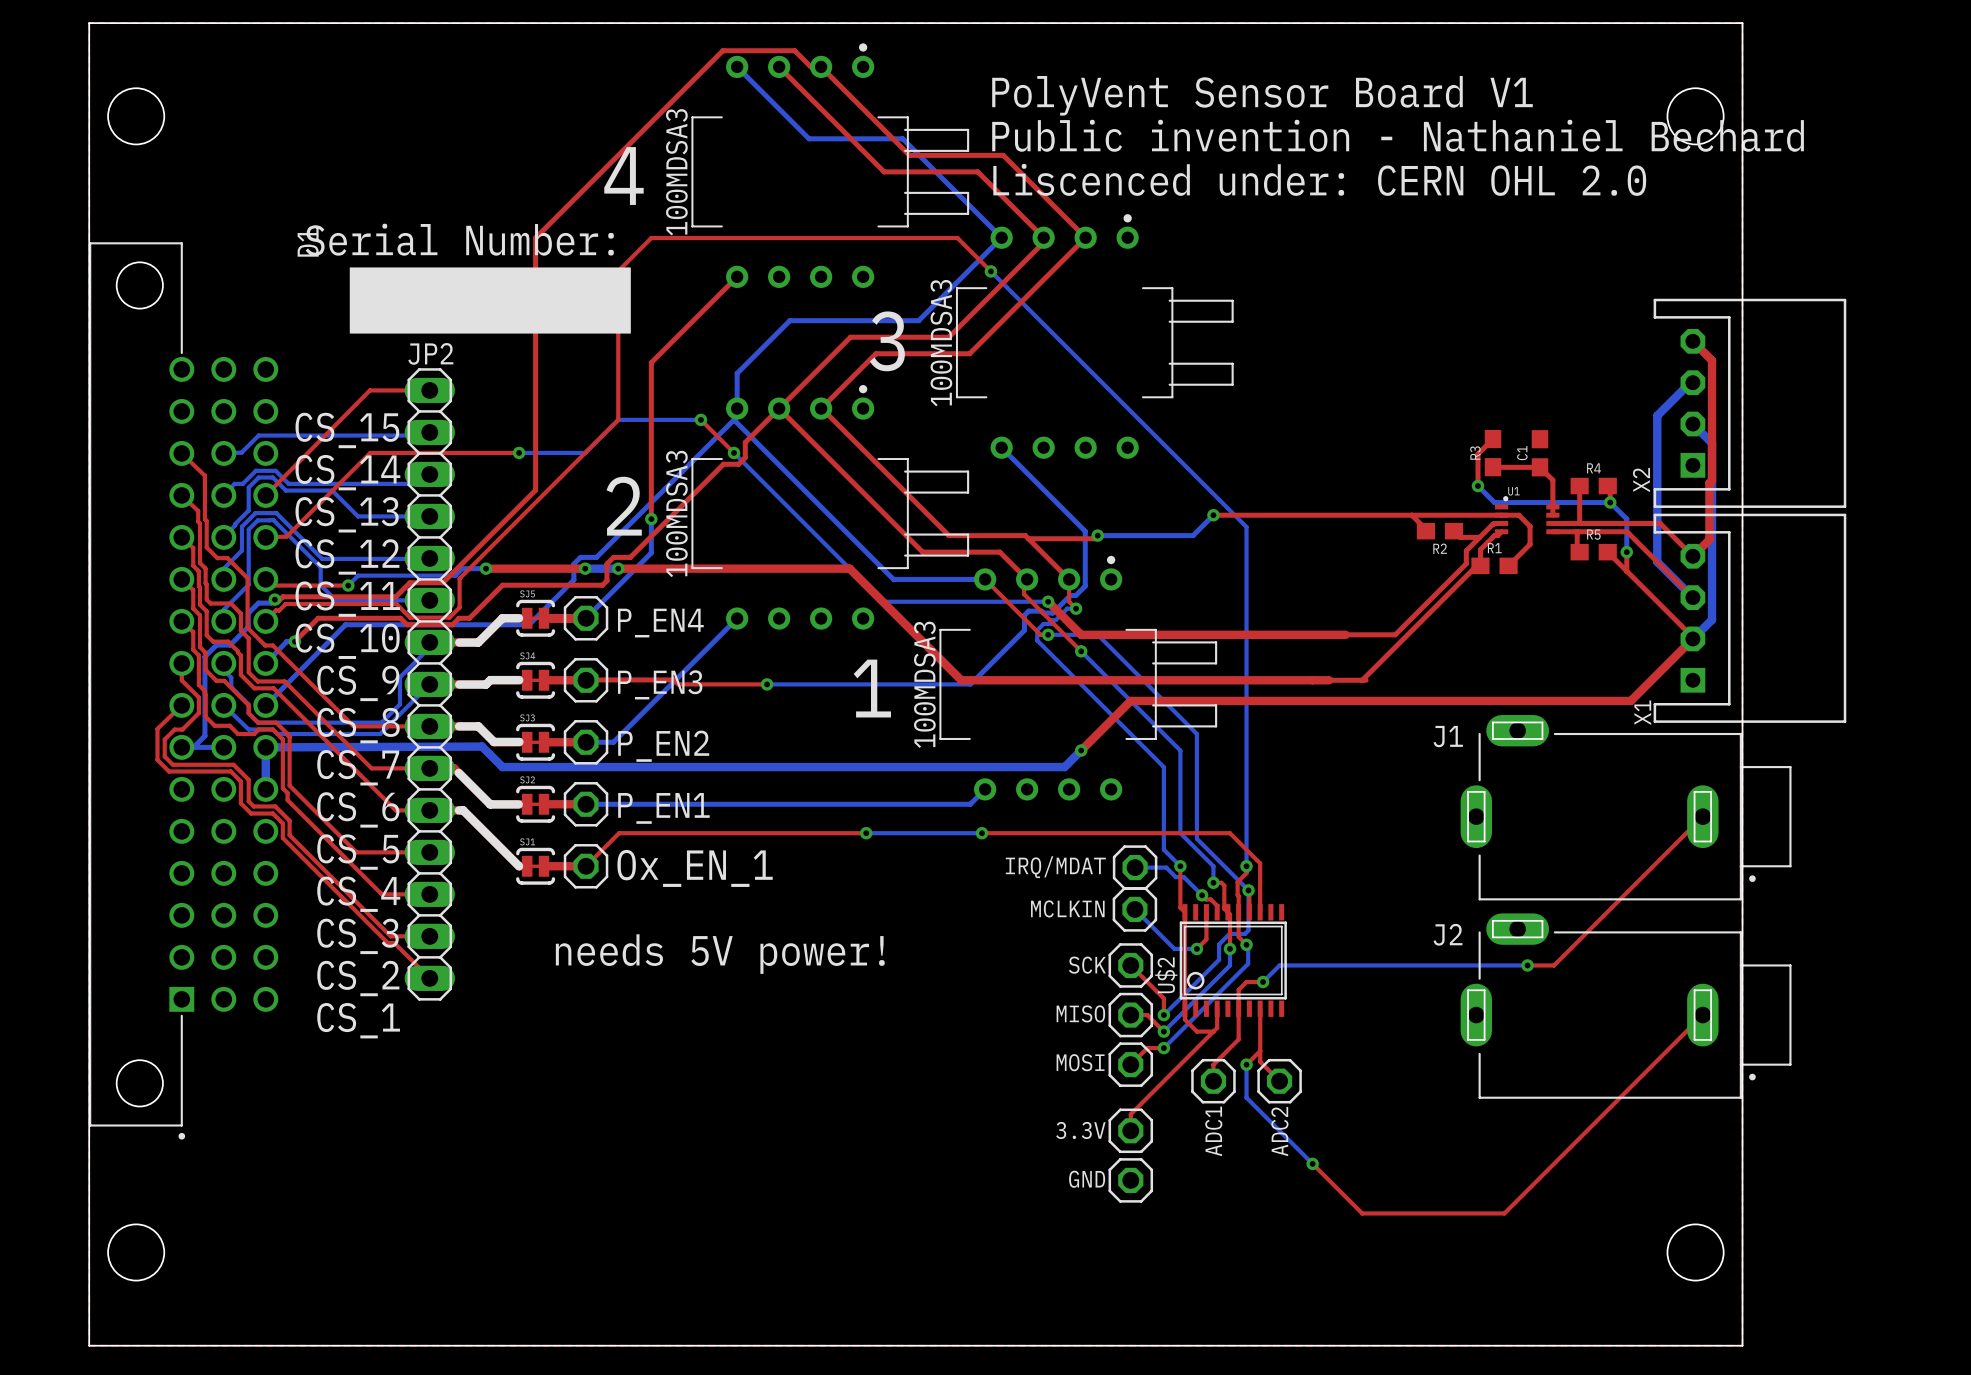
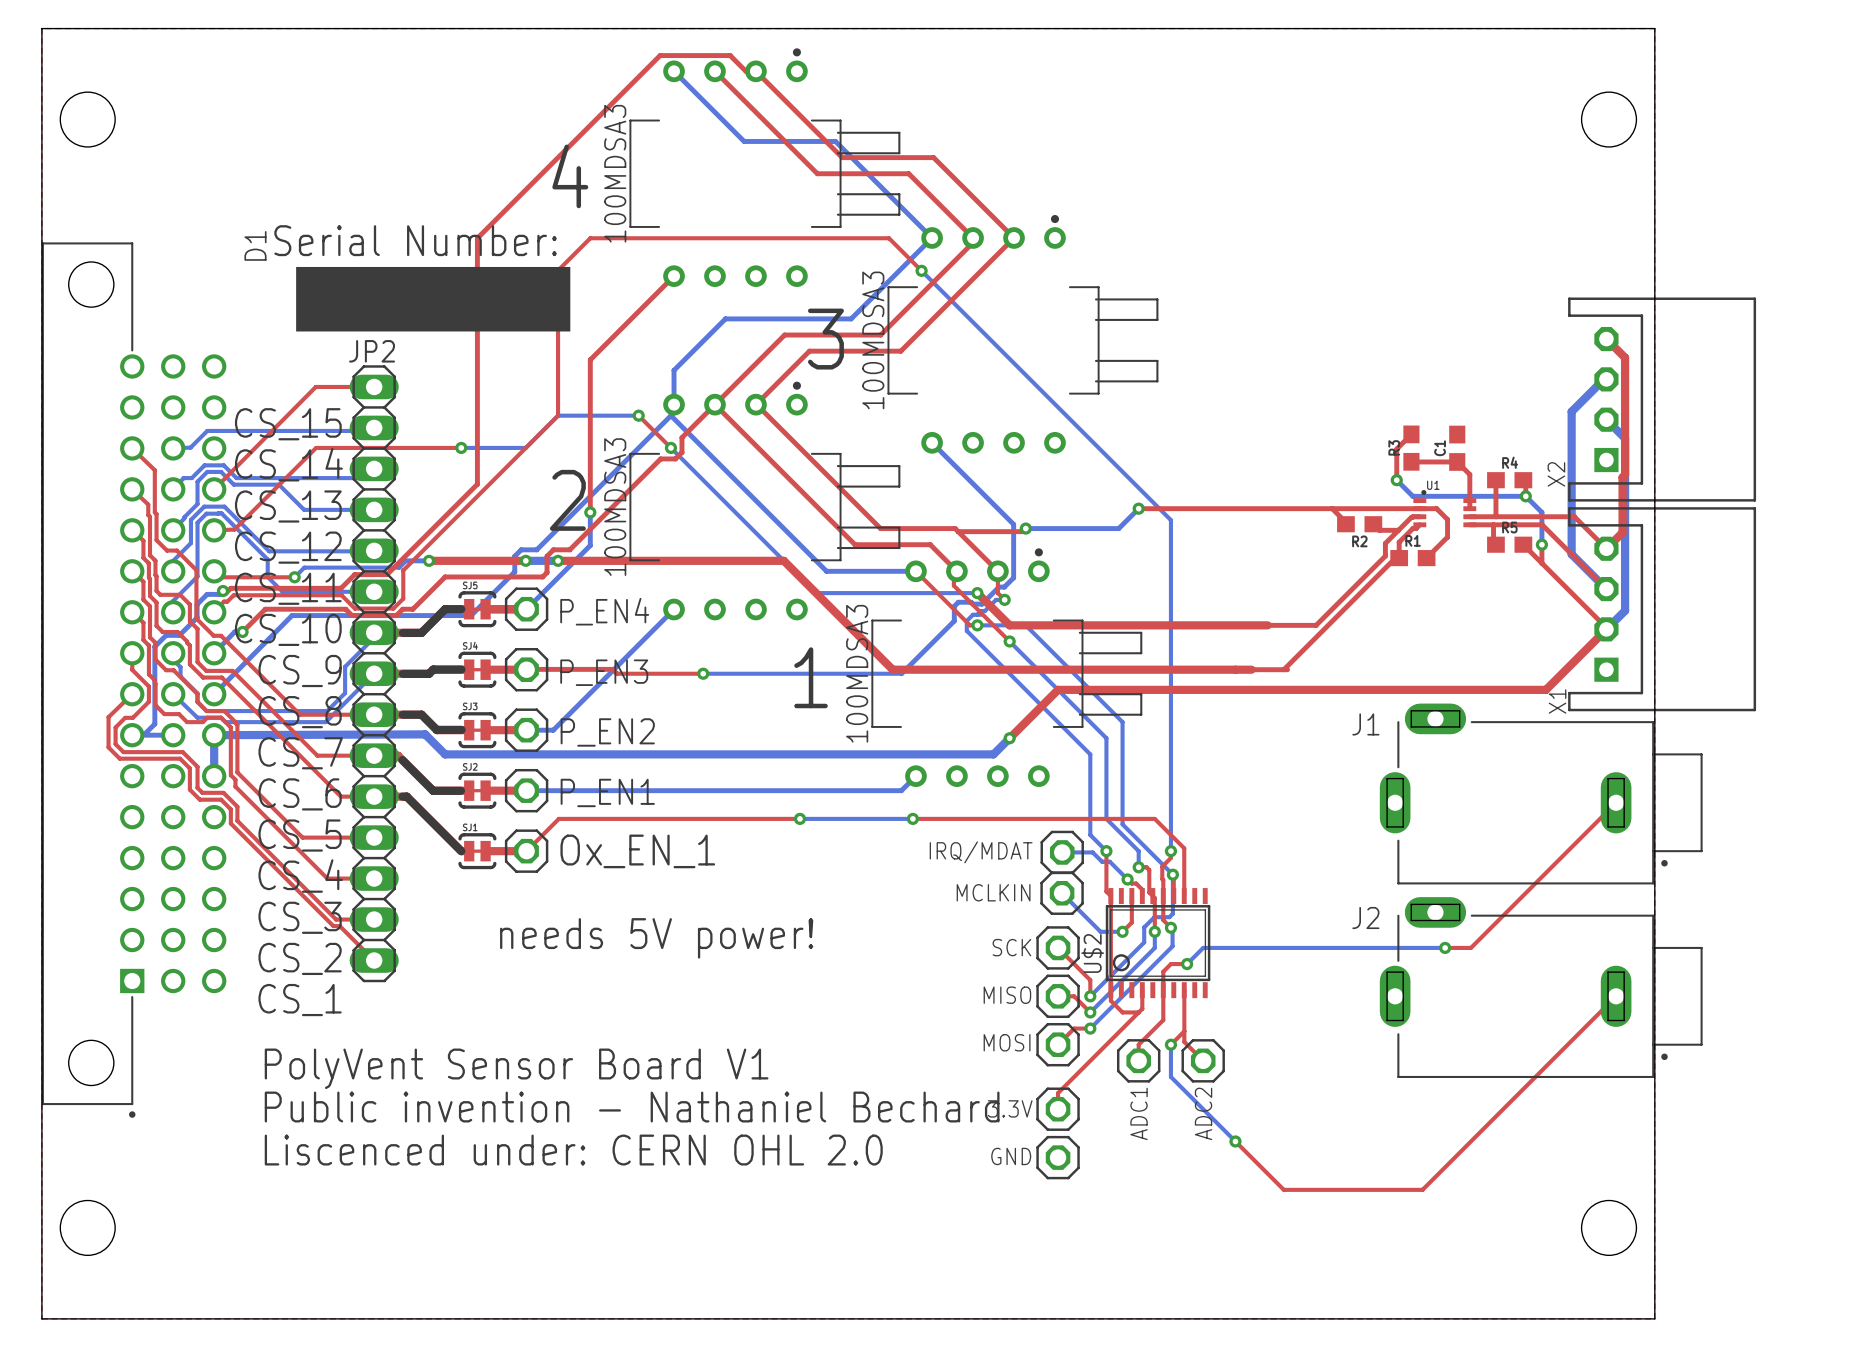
text: PolyVent Sensor Board V1 (1262, 95) -> none
text: Public invention - Nathaniel Bechard (1398, 135) -> none
text: Liscenced under: CERN OHL 2.0 (1319, 179) -> none
text: none -> PolyVent Sensor Board V1 (516, 1068)
text: none -> Public invention - Nathaniel Bechard (632, 1107)
text: none -> Liscenced under: CERN OHL 2.0 (573, 1150)

